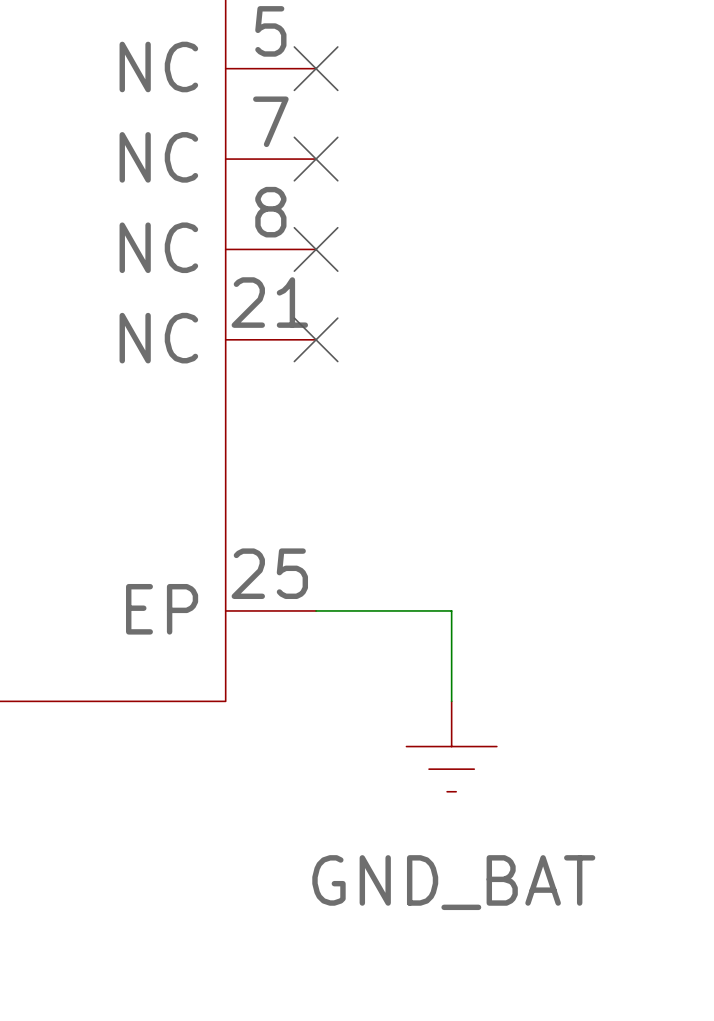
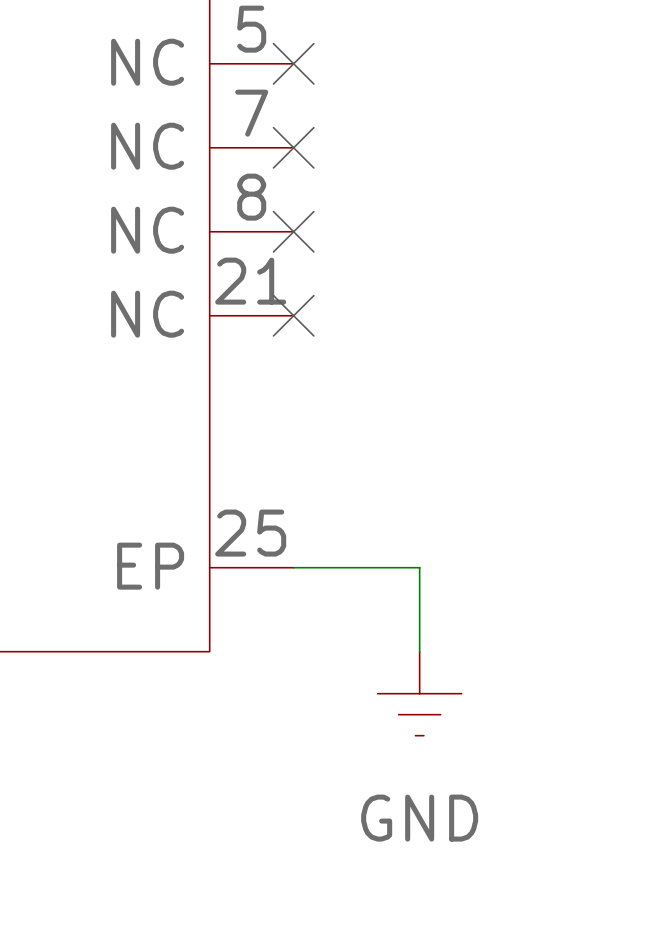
power symbol: GND_BAT (451, 746) -> GND (419, 693)

